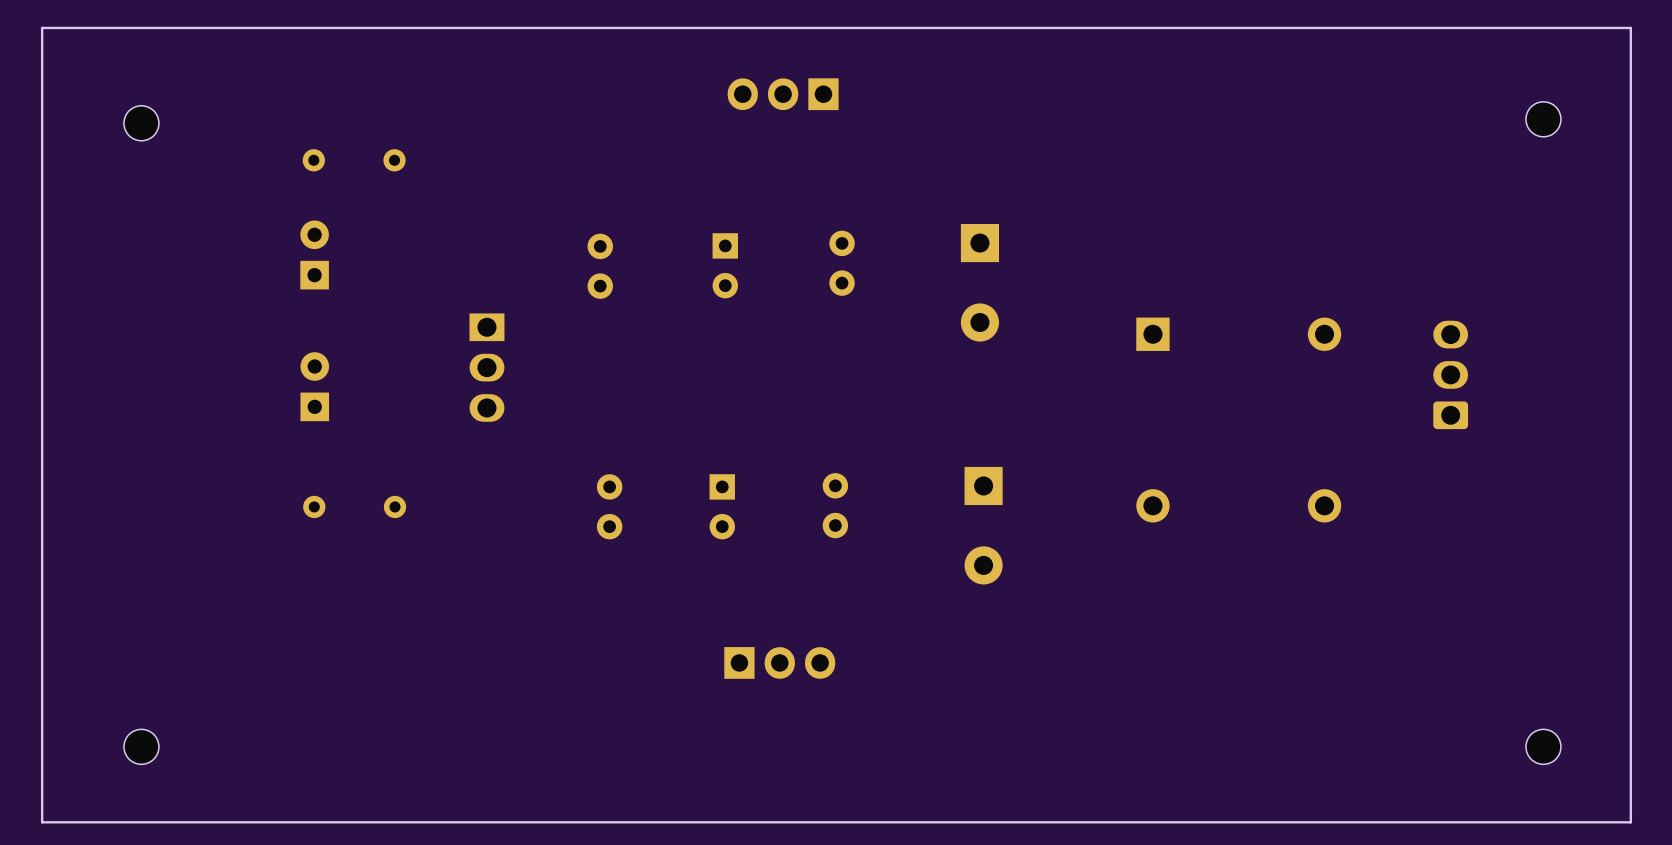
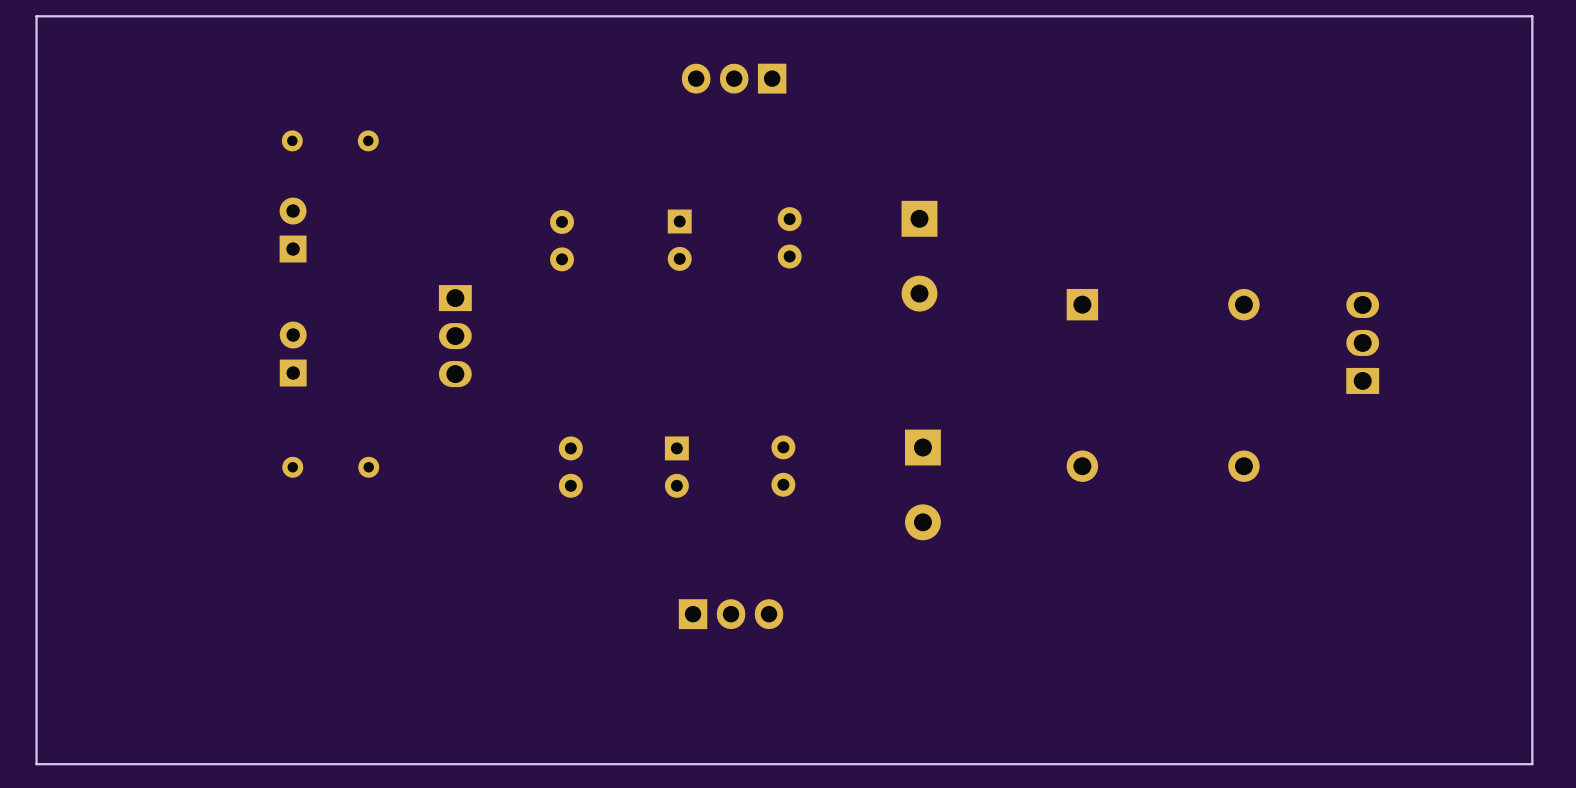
part: (1543, 119) -> none
part: (141, 123) -> none
part footprint: [1433, 320, 1469, 430] -> [1346, 291, 1380, 394]
part: (141, 746) -> none
part: (1543, 746) -> none

